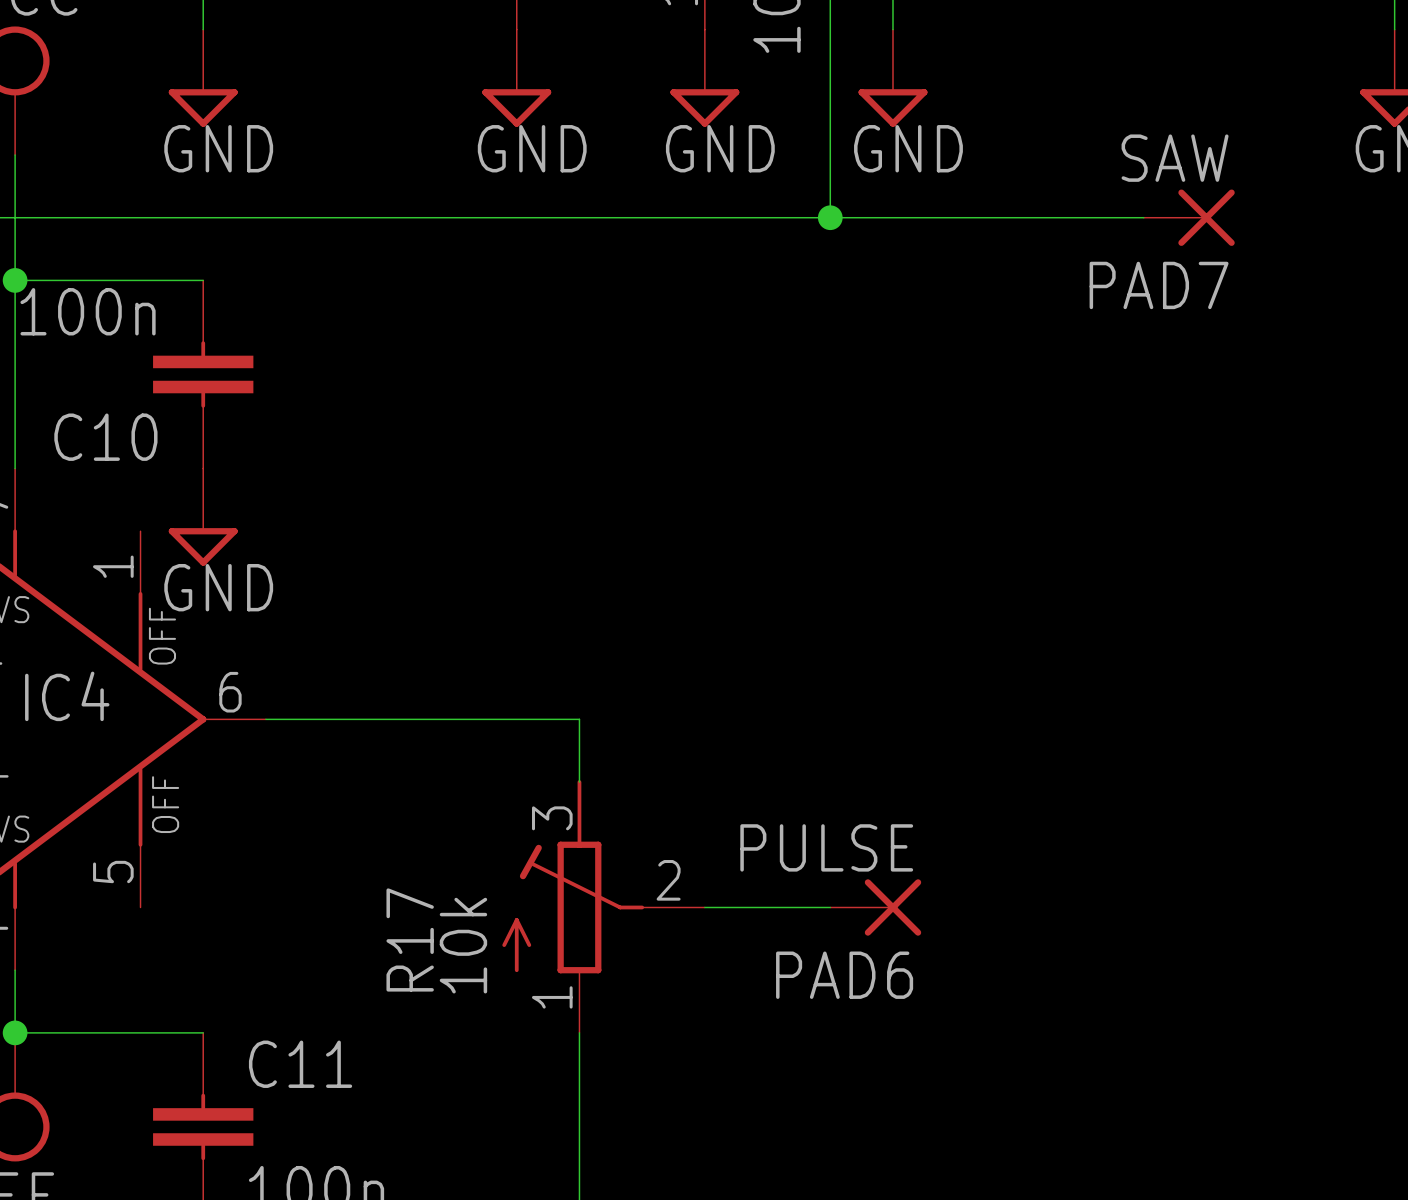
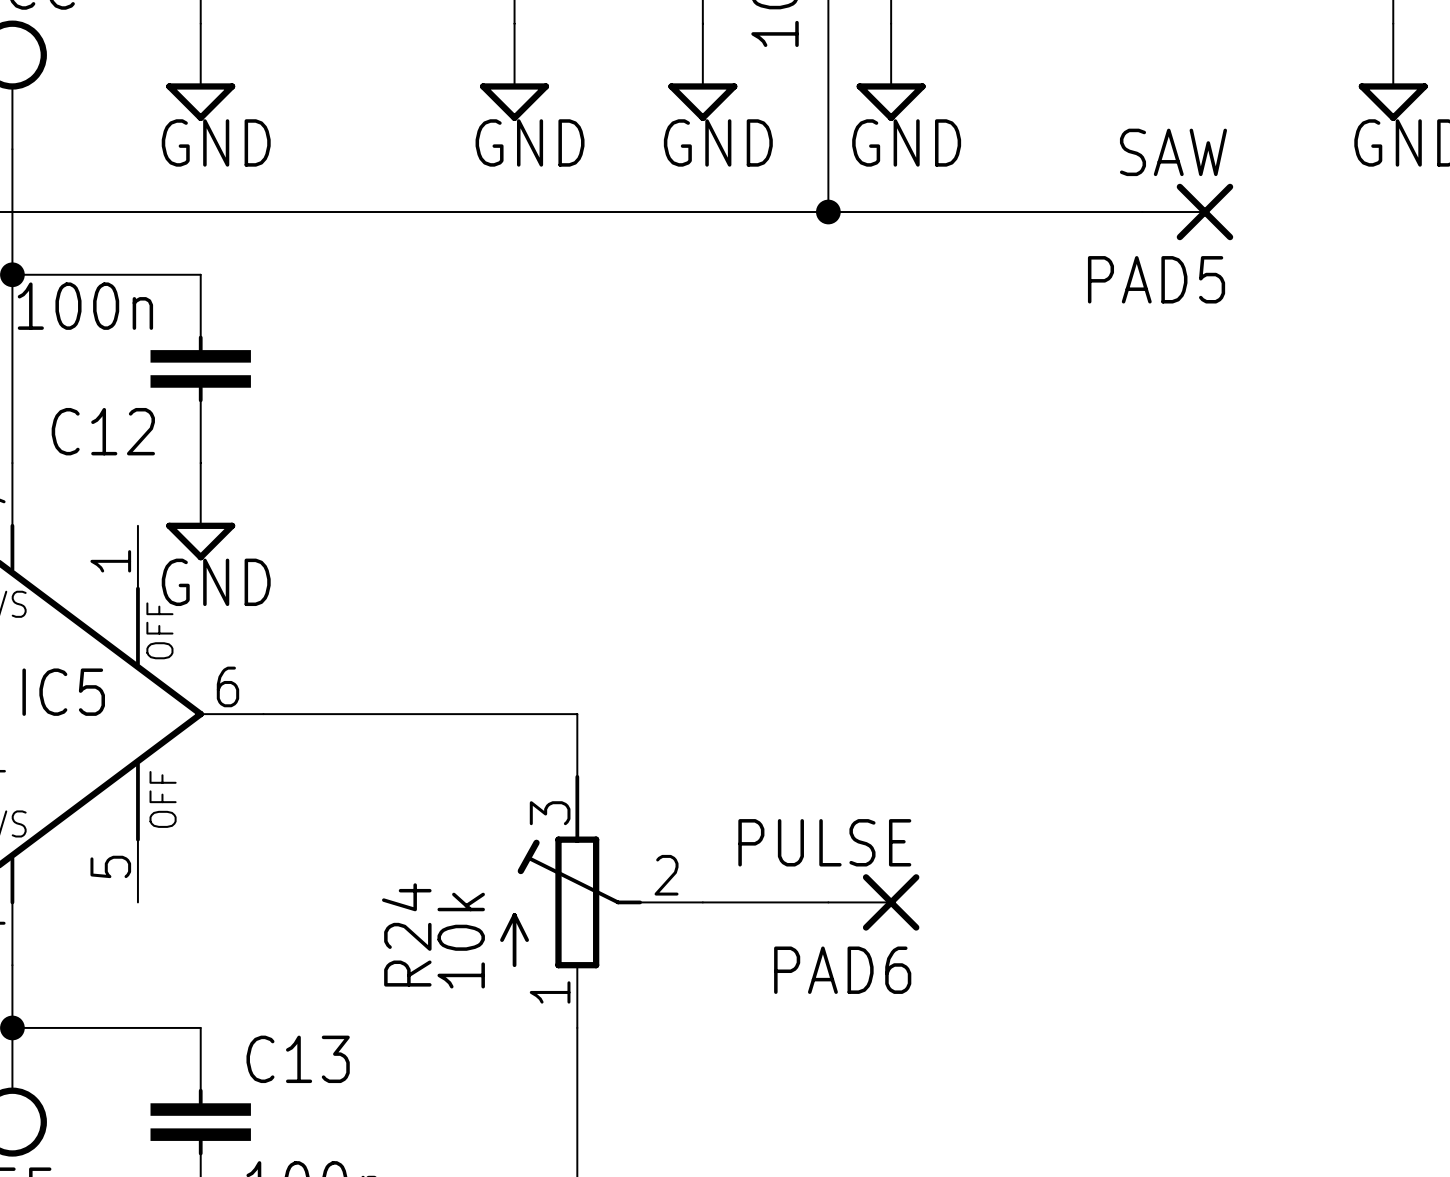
PAD7 name: PAD7 (1159, 285) -> PAD5 (1156, 279)
C10 name: C10 (105, 437) -> C12 (103, 431)
IC4 name: IC4 (67, 696) -> IC5 (63, 692)
R17 name: R17 (410, 939) -> R24 (406, 934)
C11 name: C11 (300, 1064) -> C13 (298, 1059)

